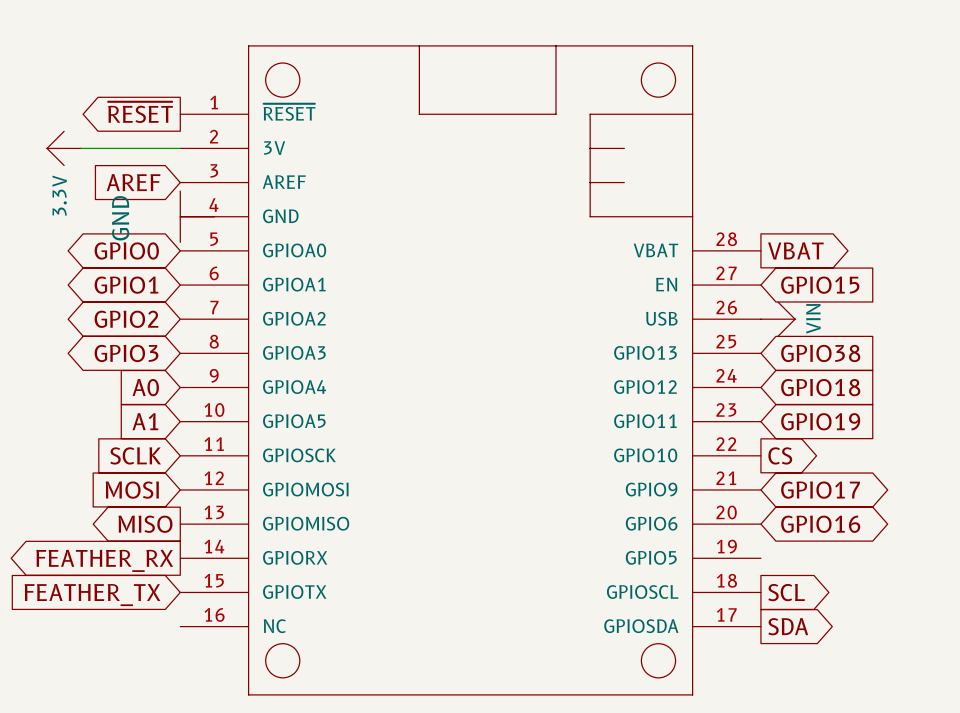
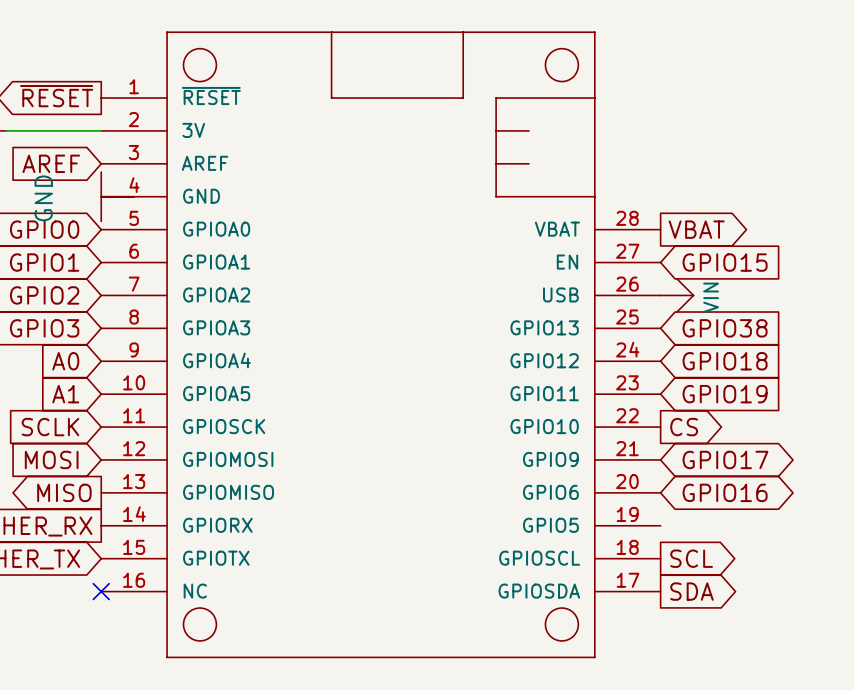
no-connect mark: none -> (101, 591)

